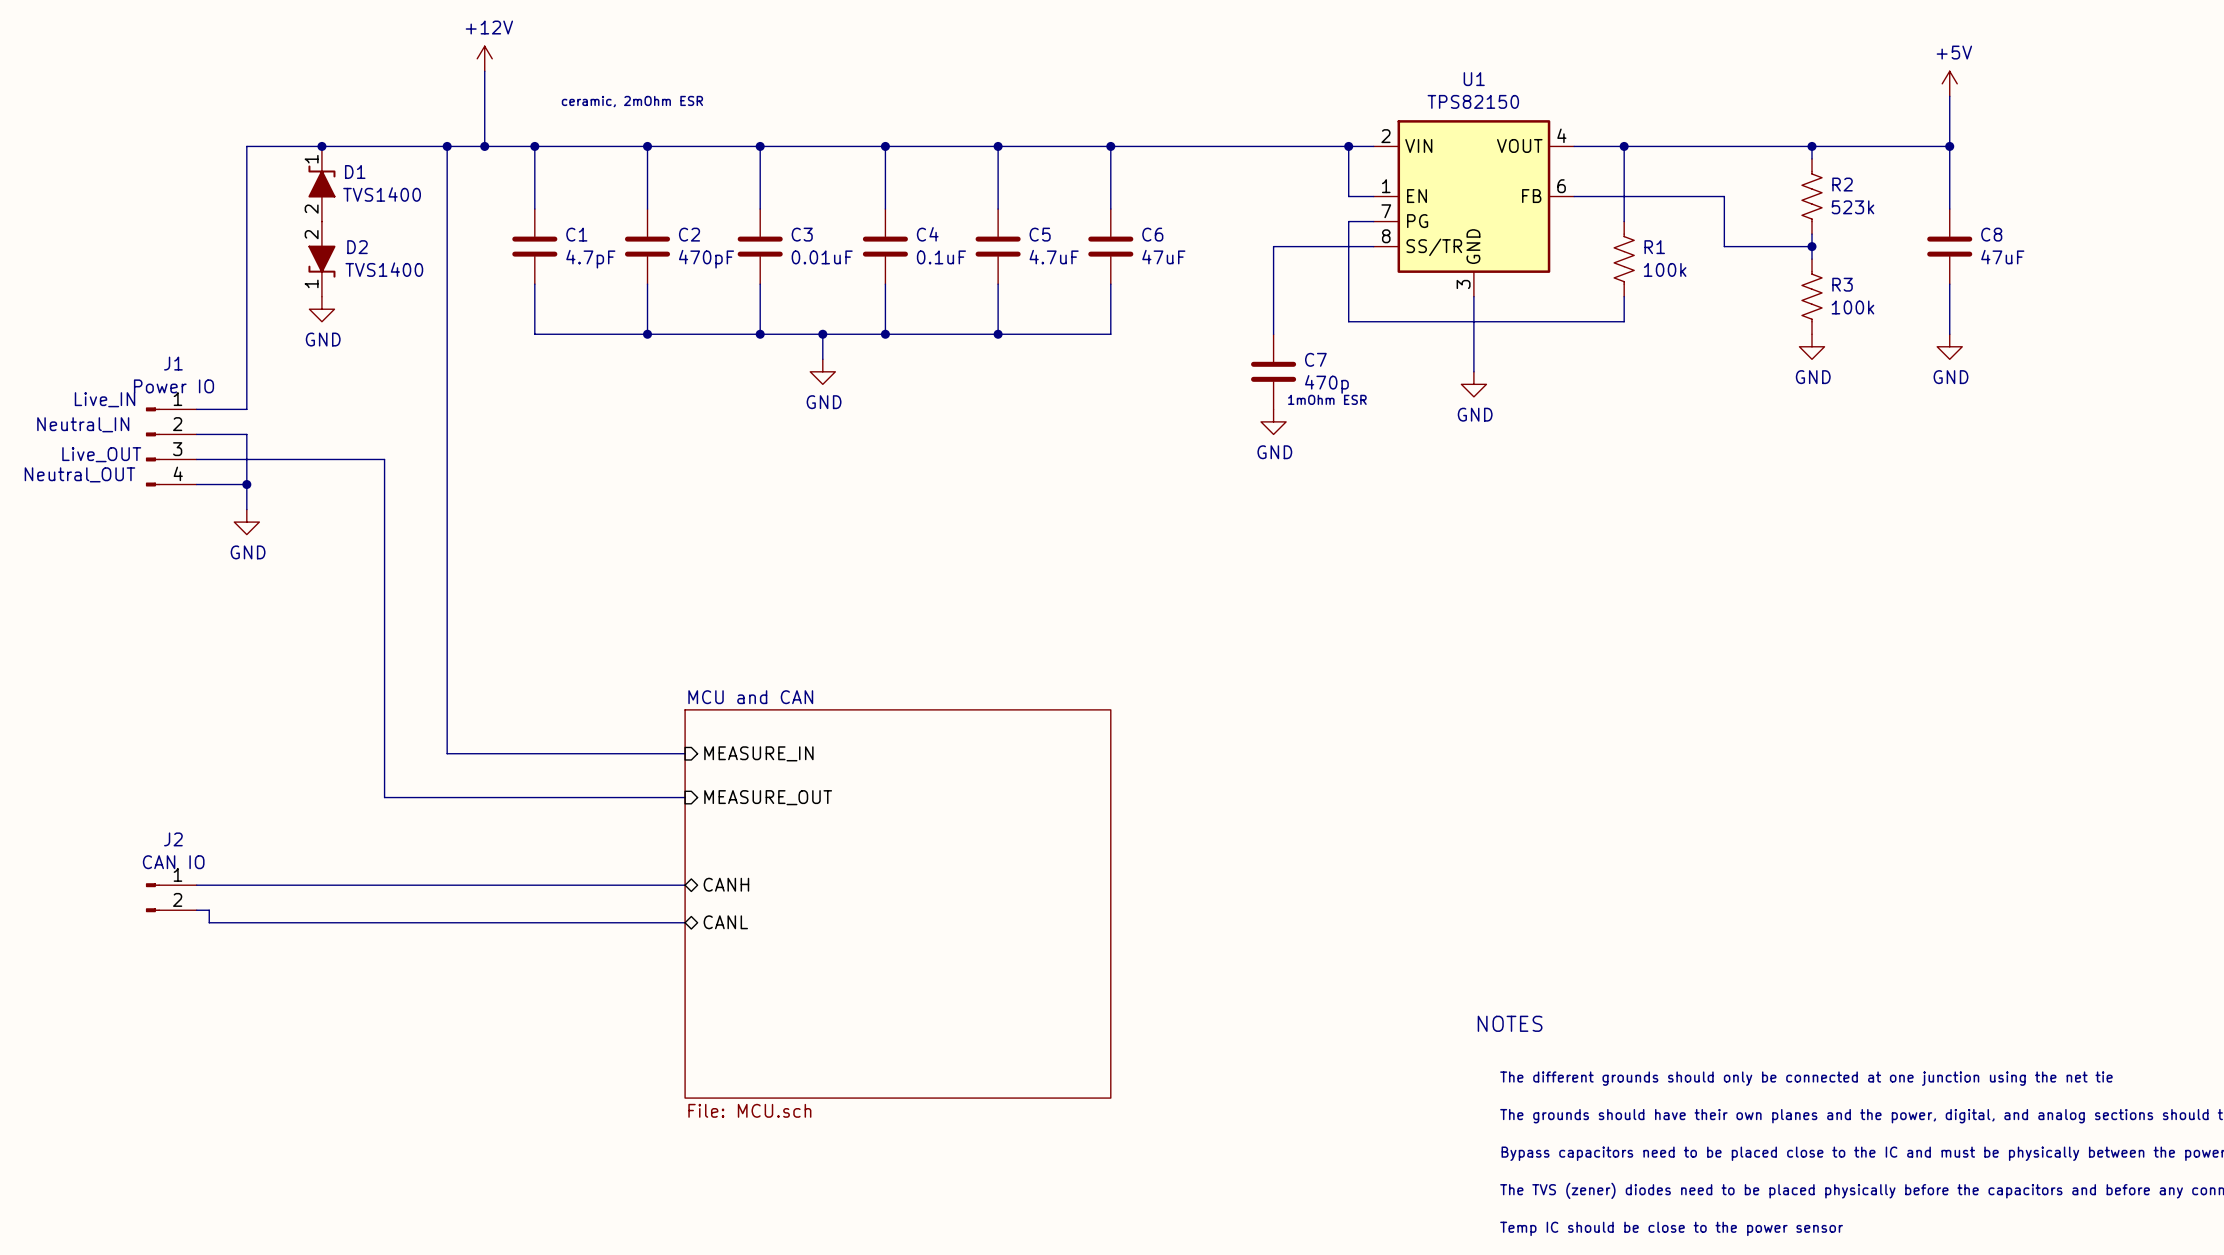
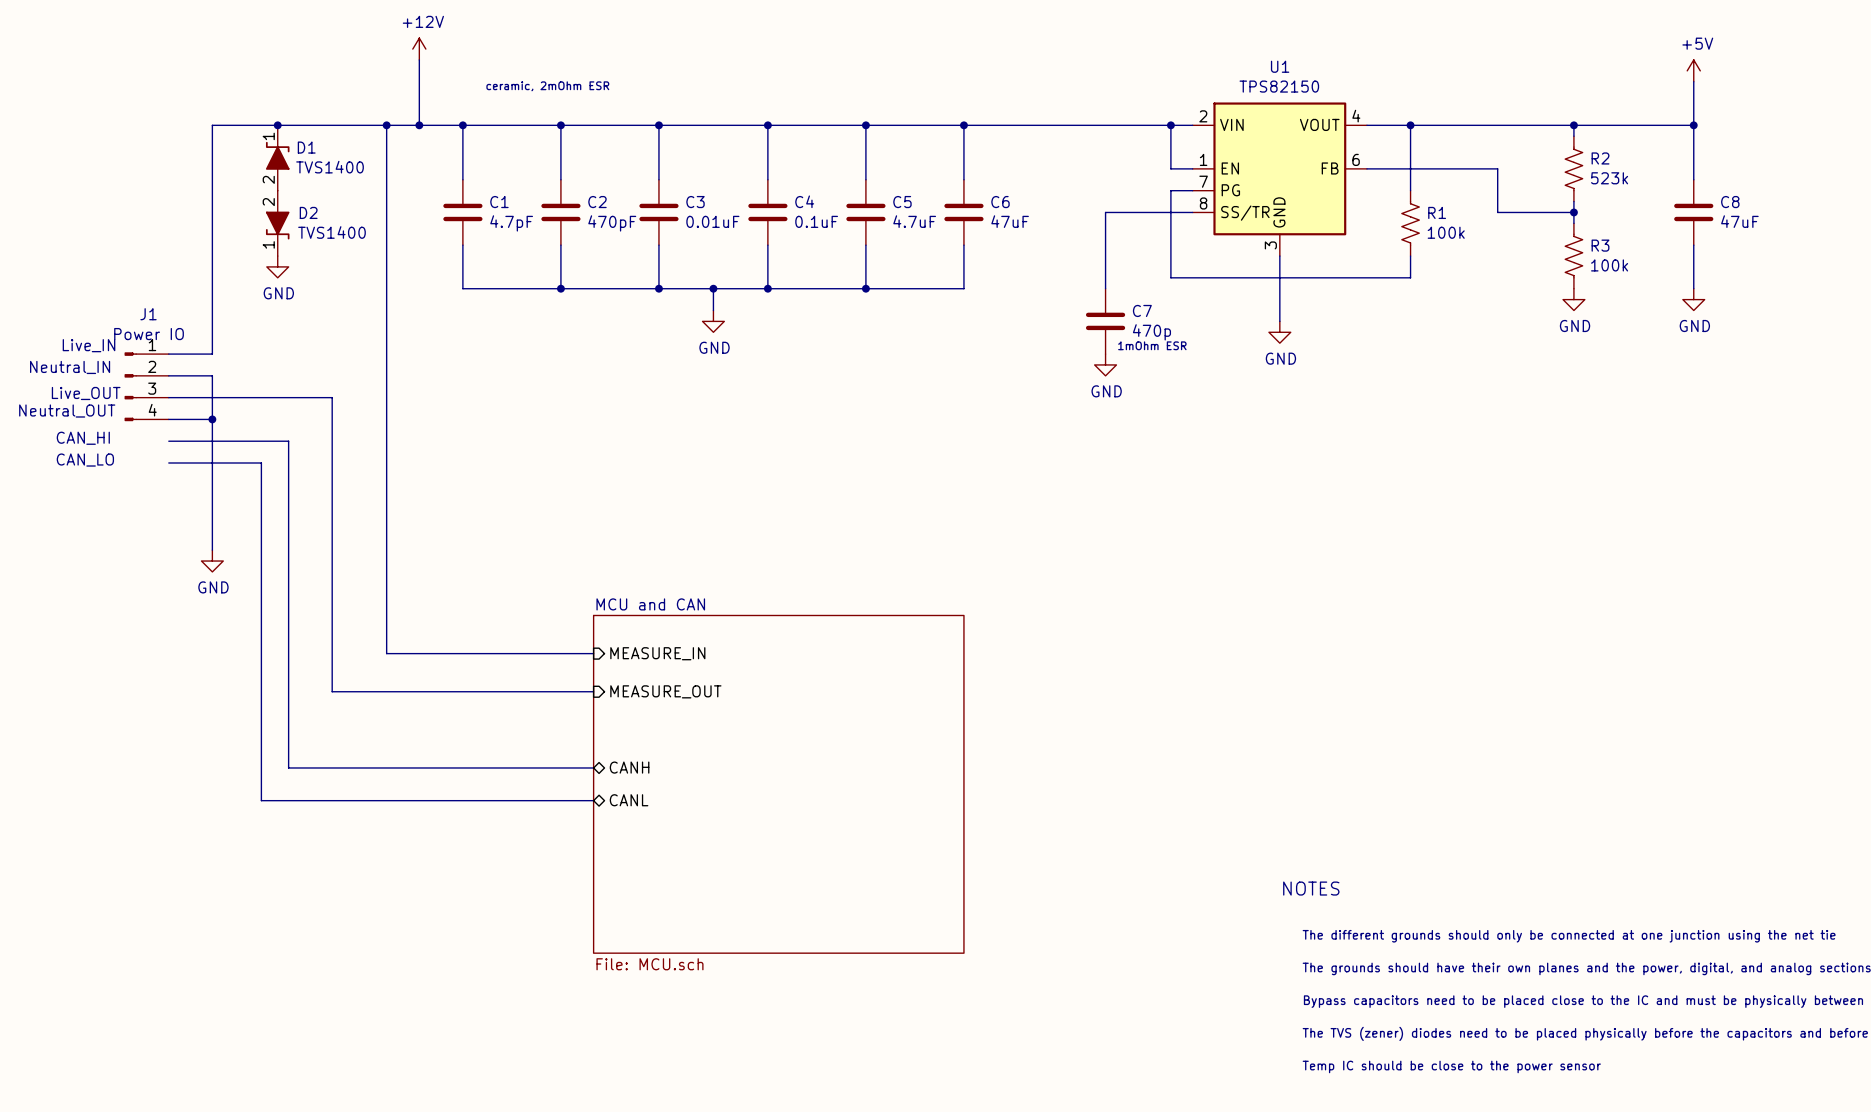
text: none -> CAN_HI (83, 438)
wire: none -> (212, 441) (212, 550)
power symbol position: GND (246, 522) -> GND (212, 561)
text: none -> CAN_LO (85, 460)
wire: (196, 885) (334, 885) -> (168, 441) (288, 441) (288, 767)
J2: CAN IO (171, 897) -> none
wire: (196, 910) (209, 910) (209, 922) (303, 922) -> (168, 462) (261, 462) (261, 800)

